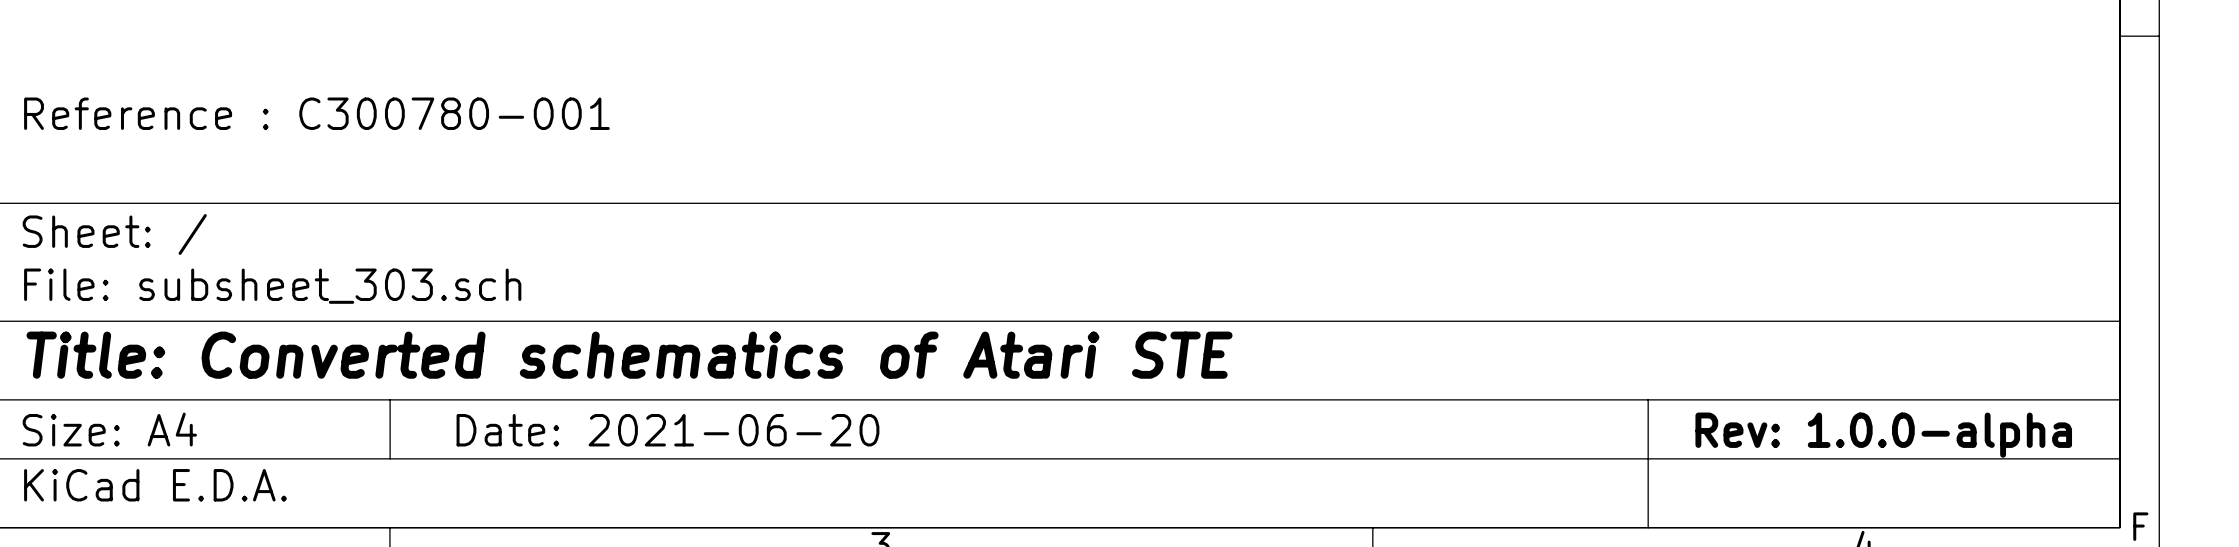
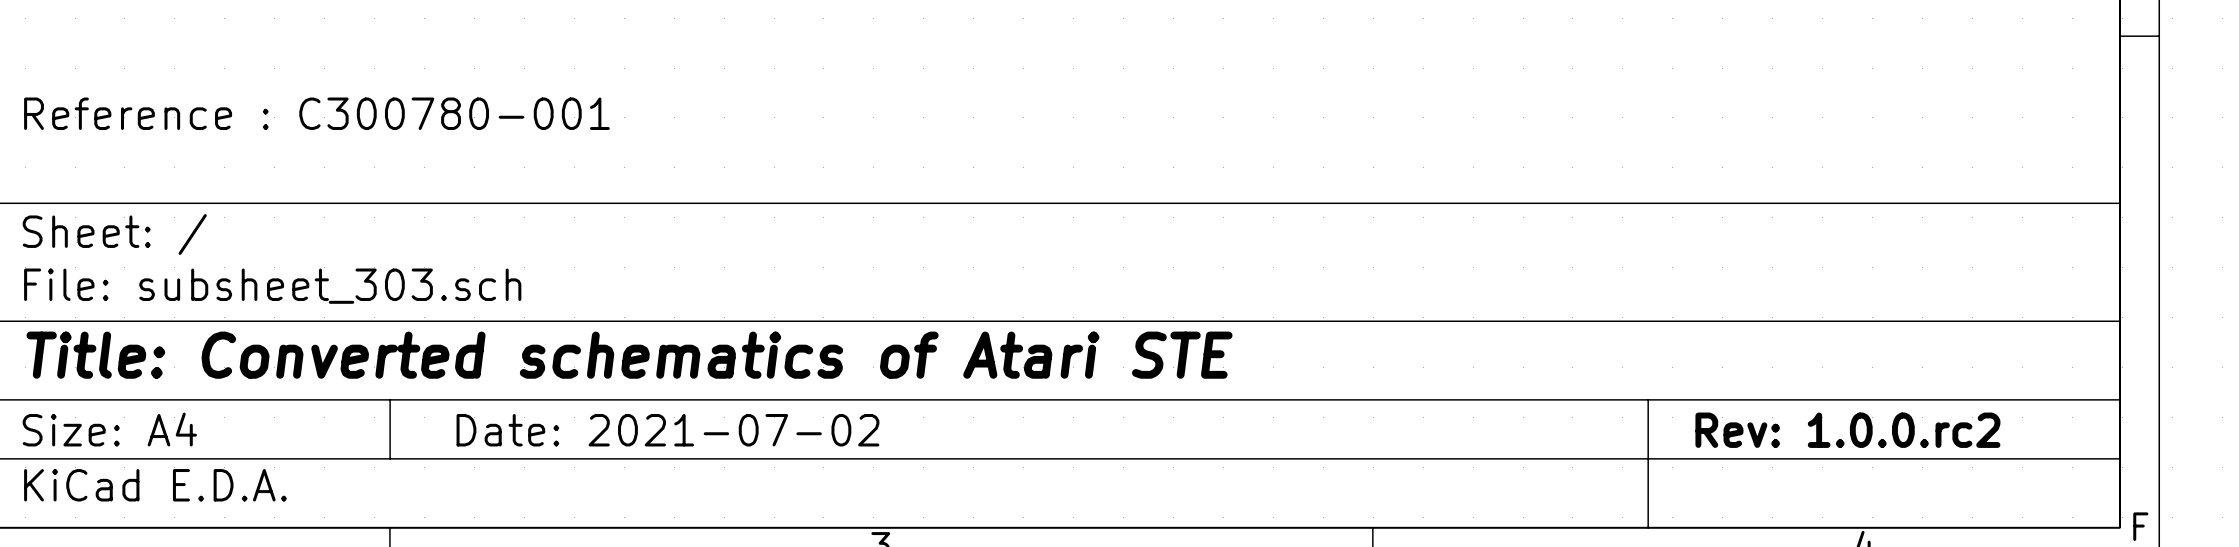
title block: Date: 2021-06-20 (667, 430) -> Date: 2021-07-02 (667, 430)
title block: Rev: 1.0.0-alpha (1883, 435) -> Rev: 1.0.0.rc2 (1847, 430)

